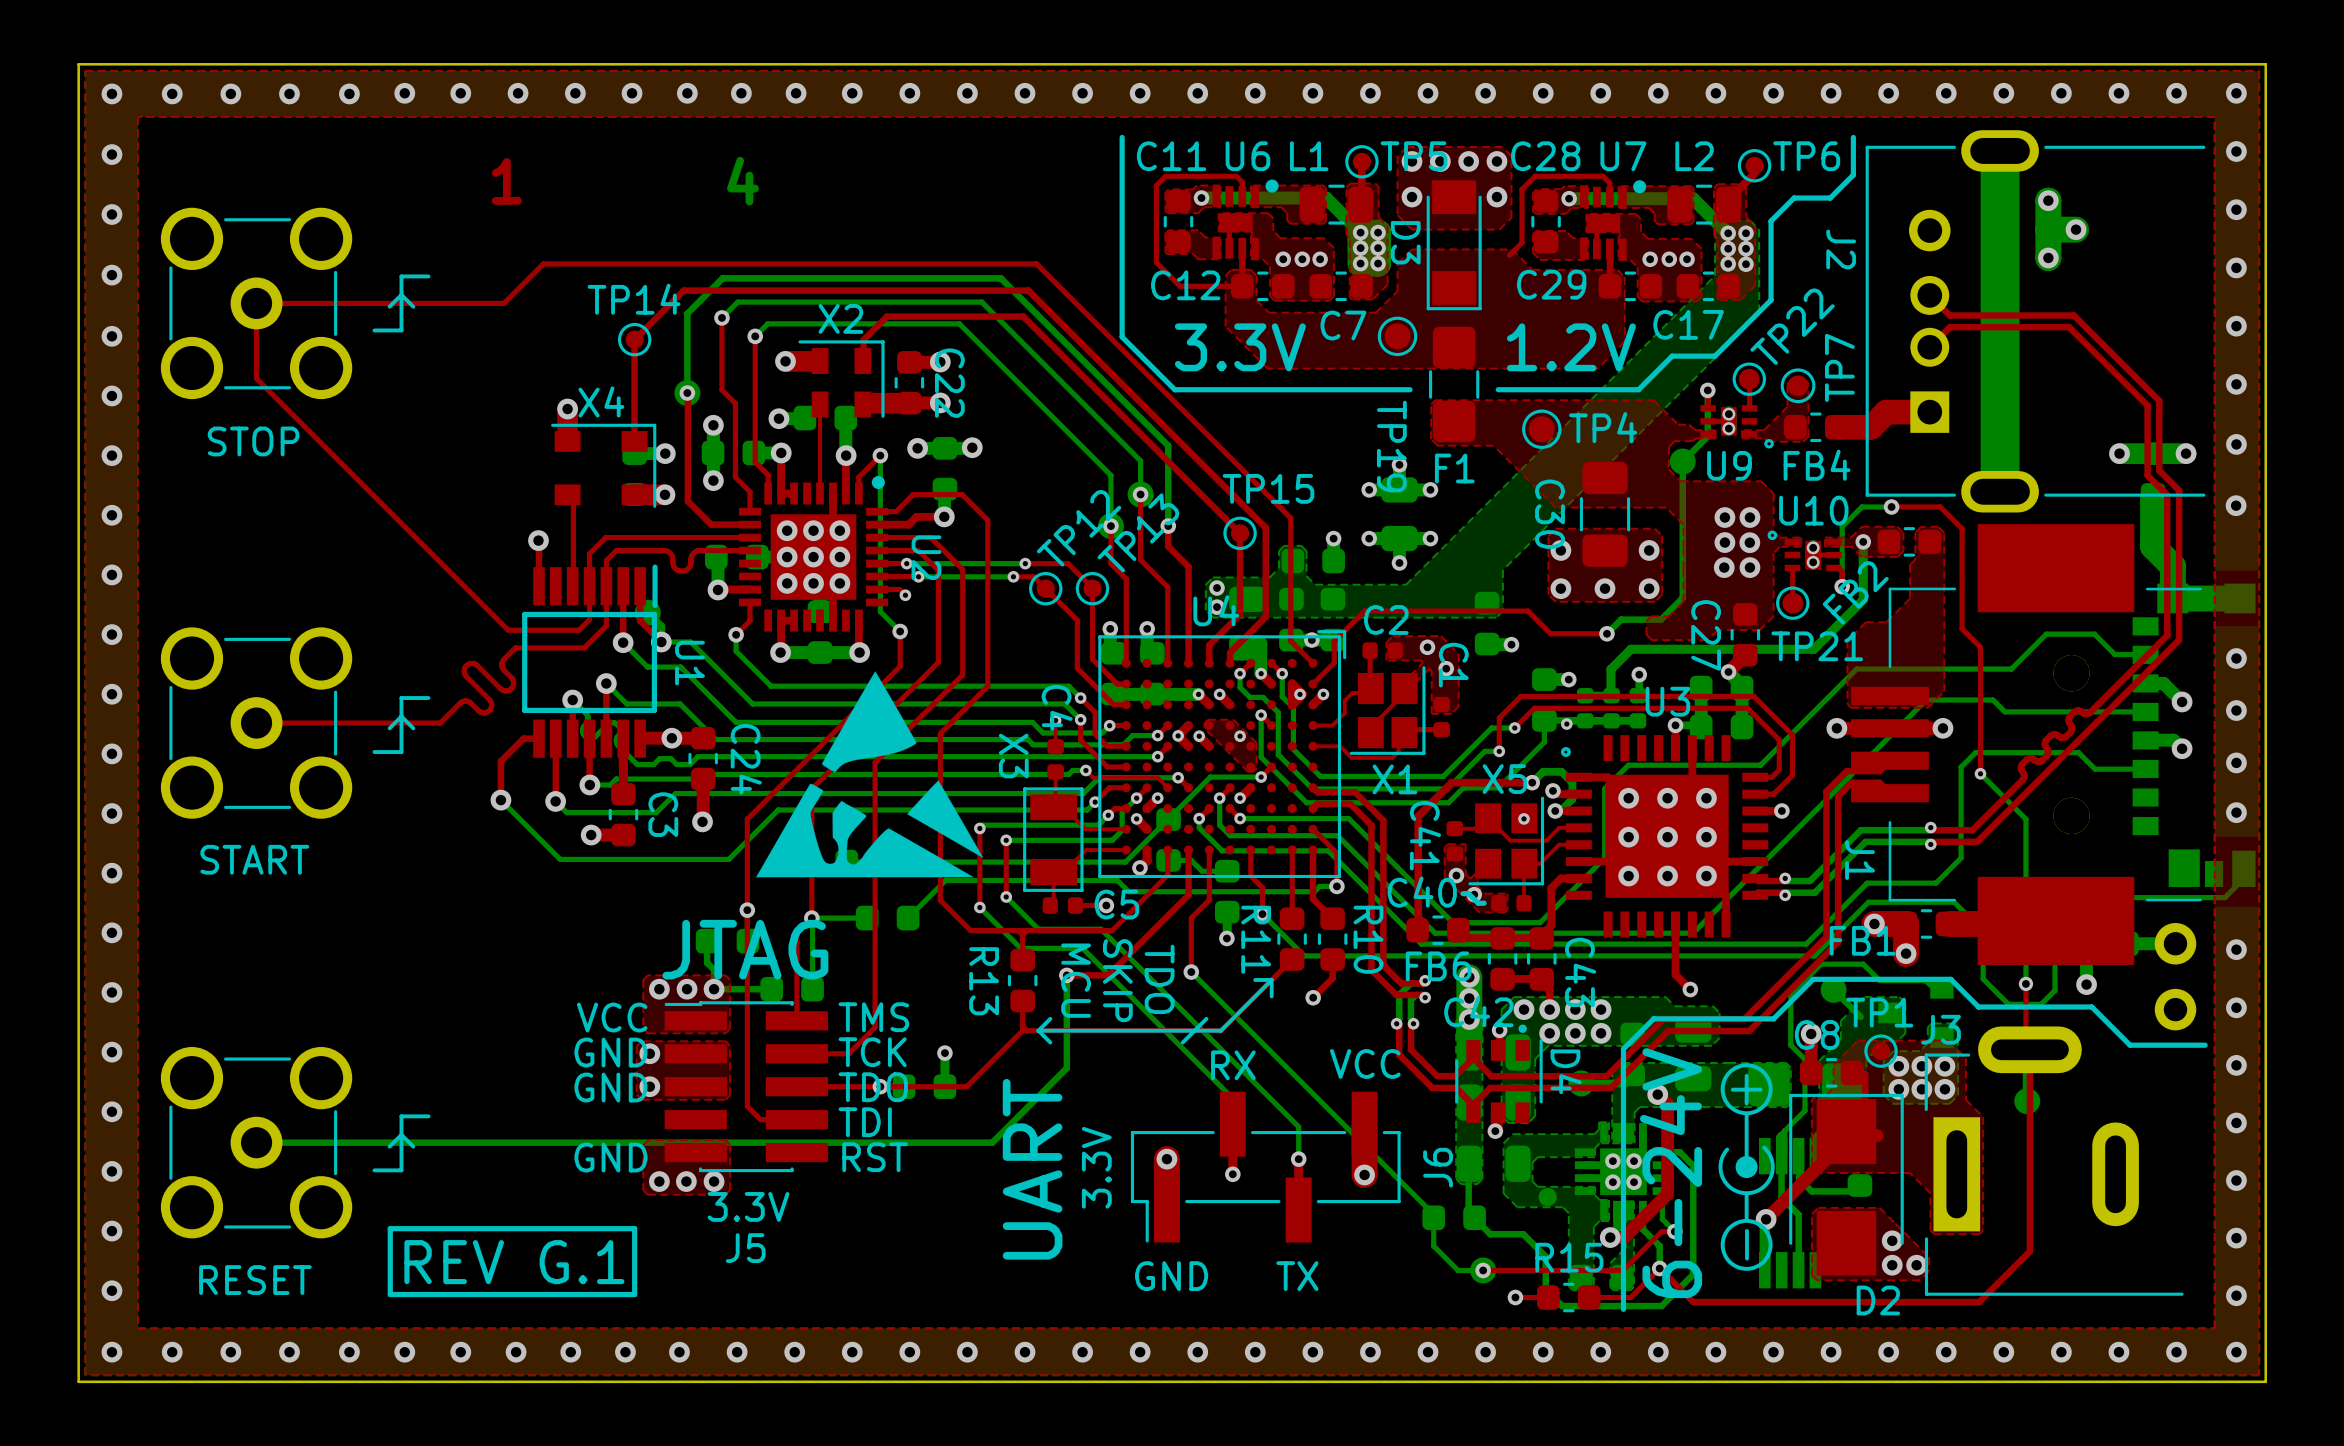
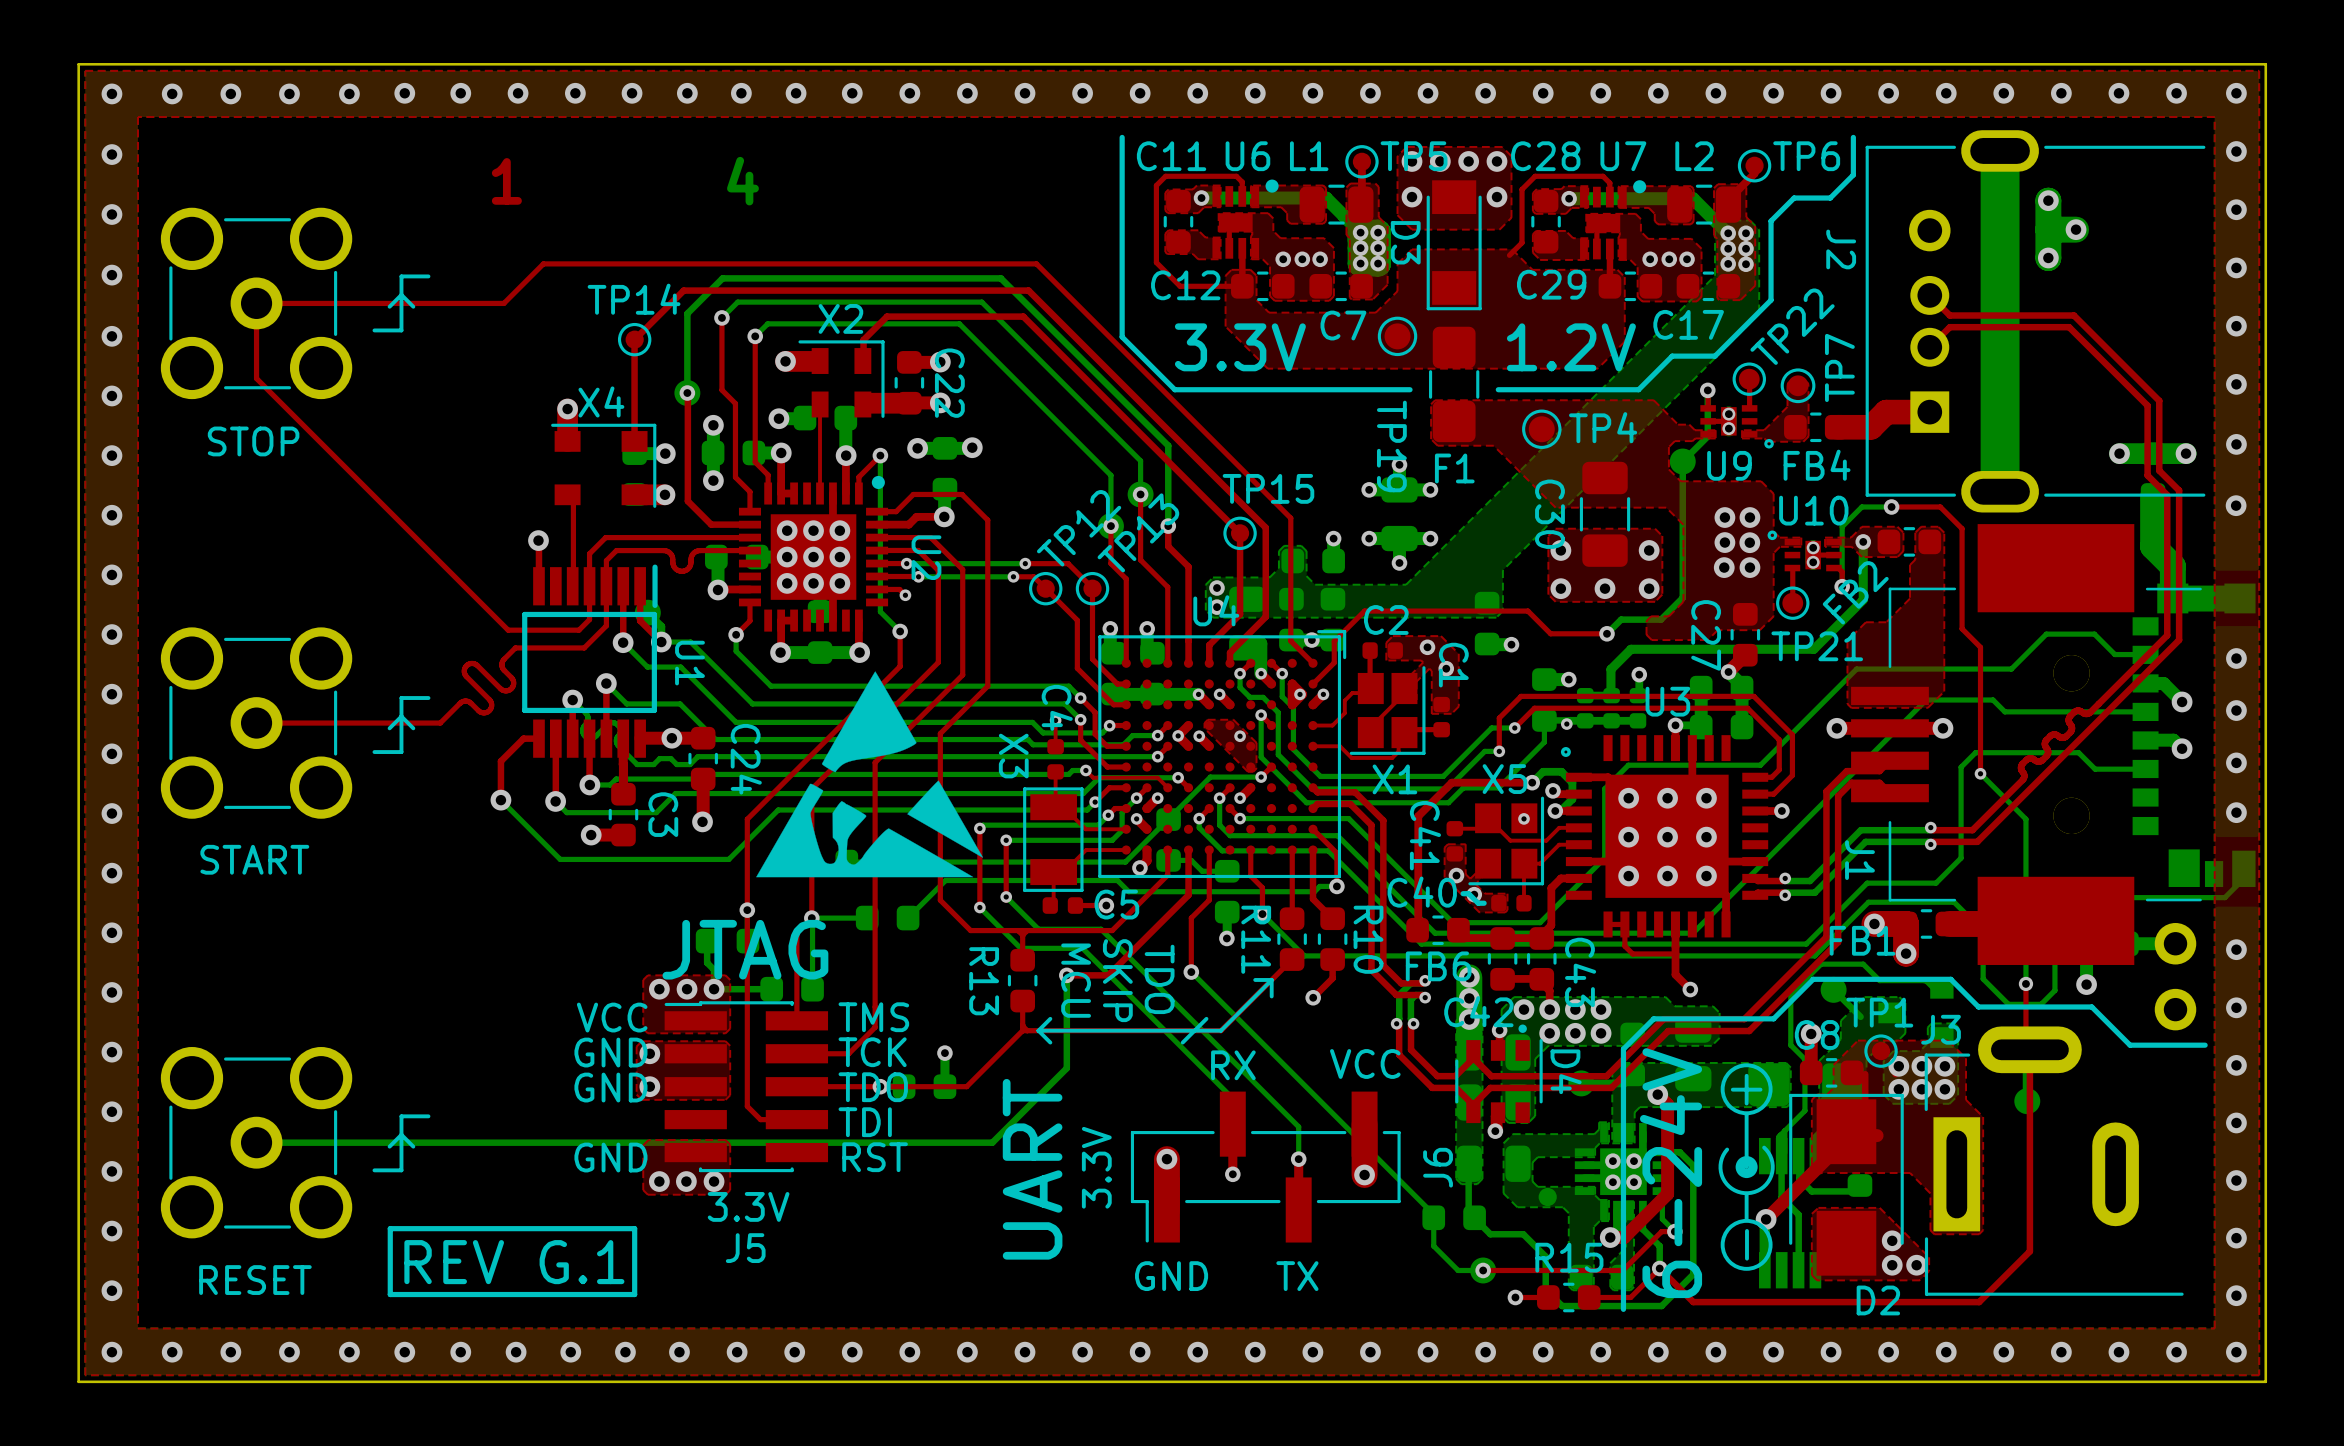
top track: none -> (1608, 924) (1624, 924) (1624, 946) (1632, 953) (1675, 953)

